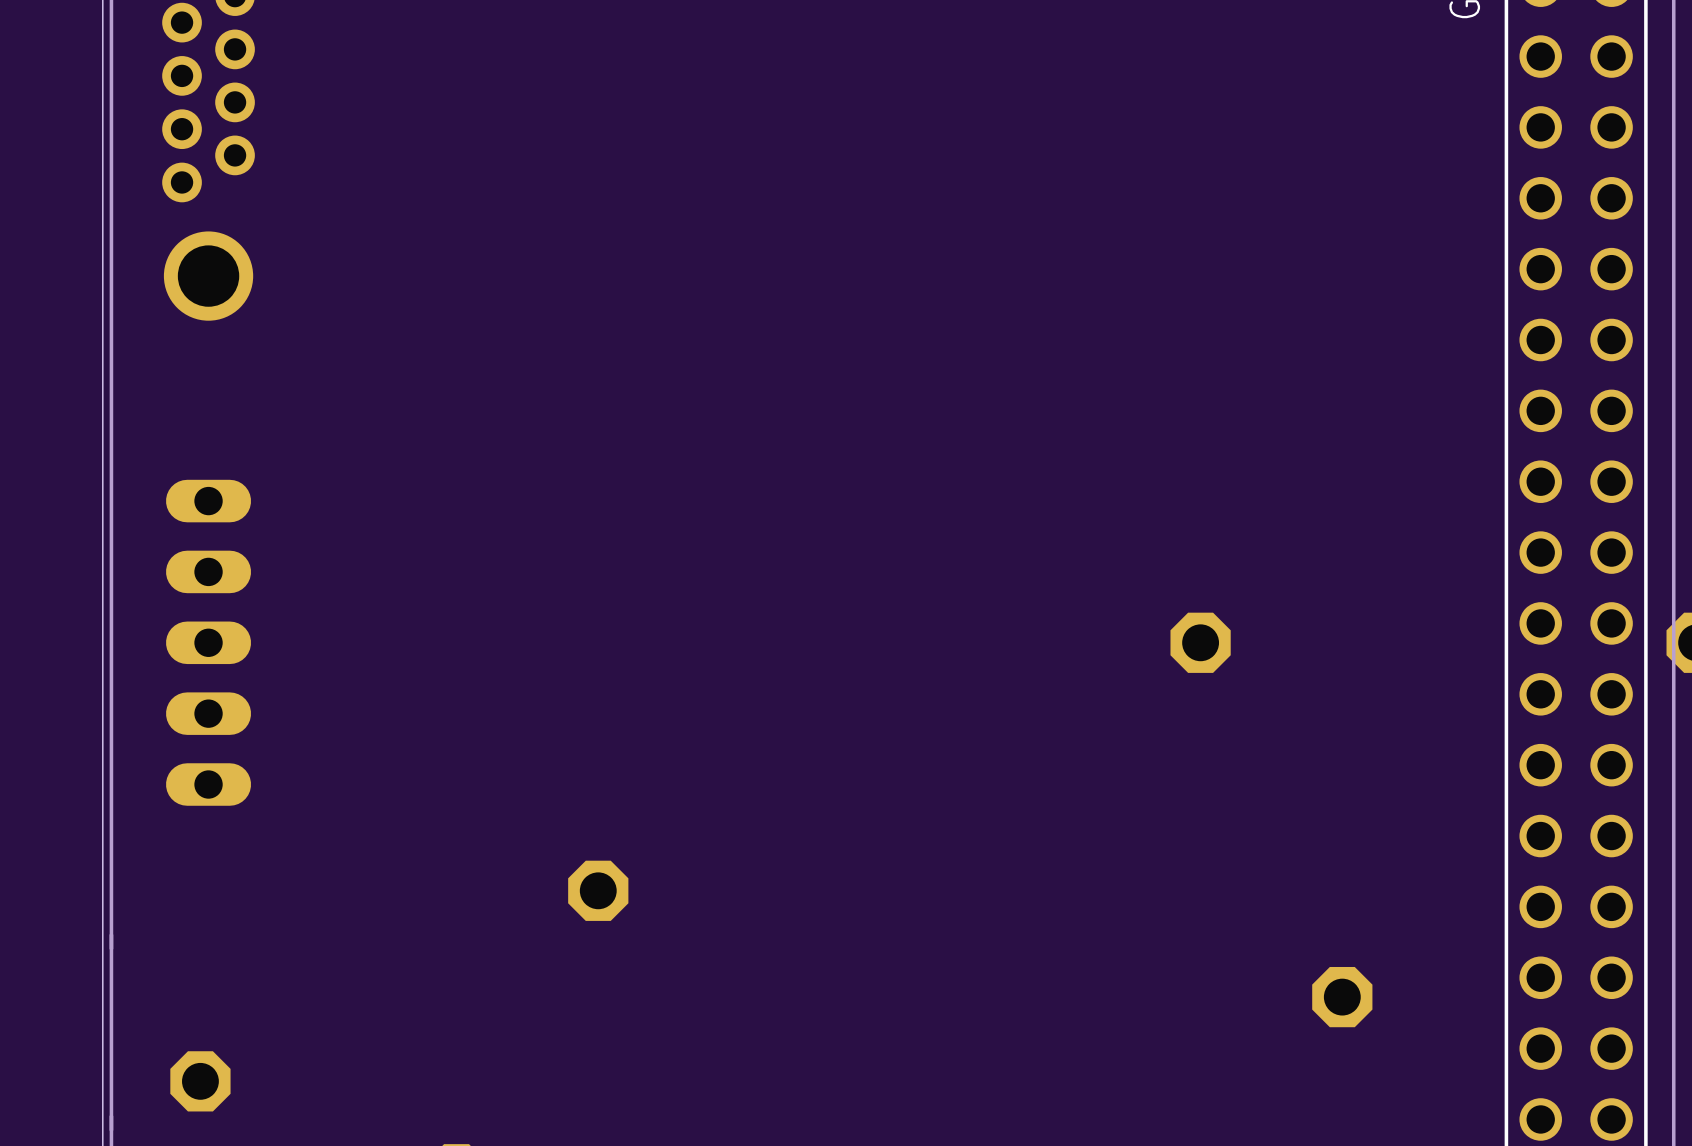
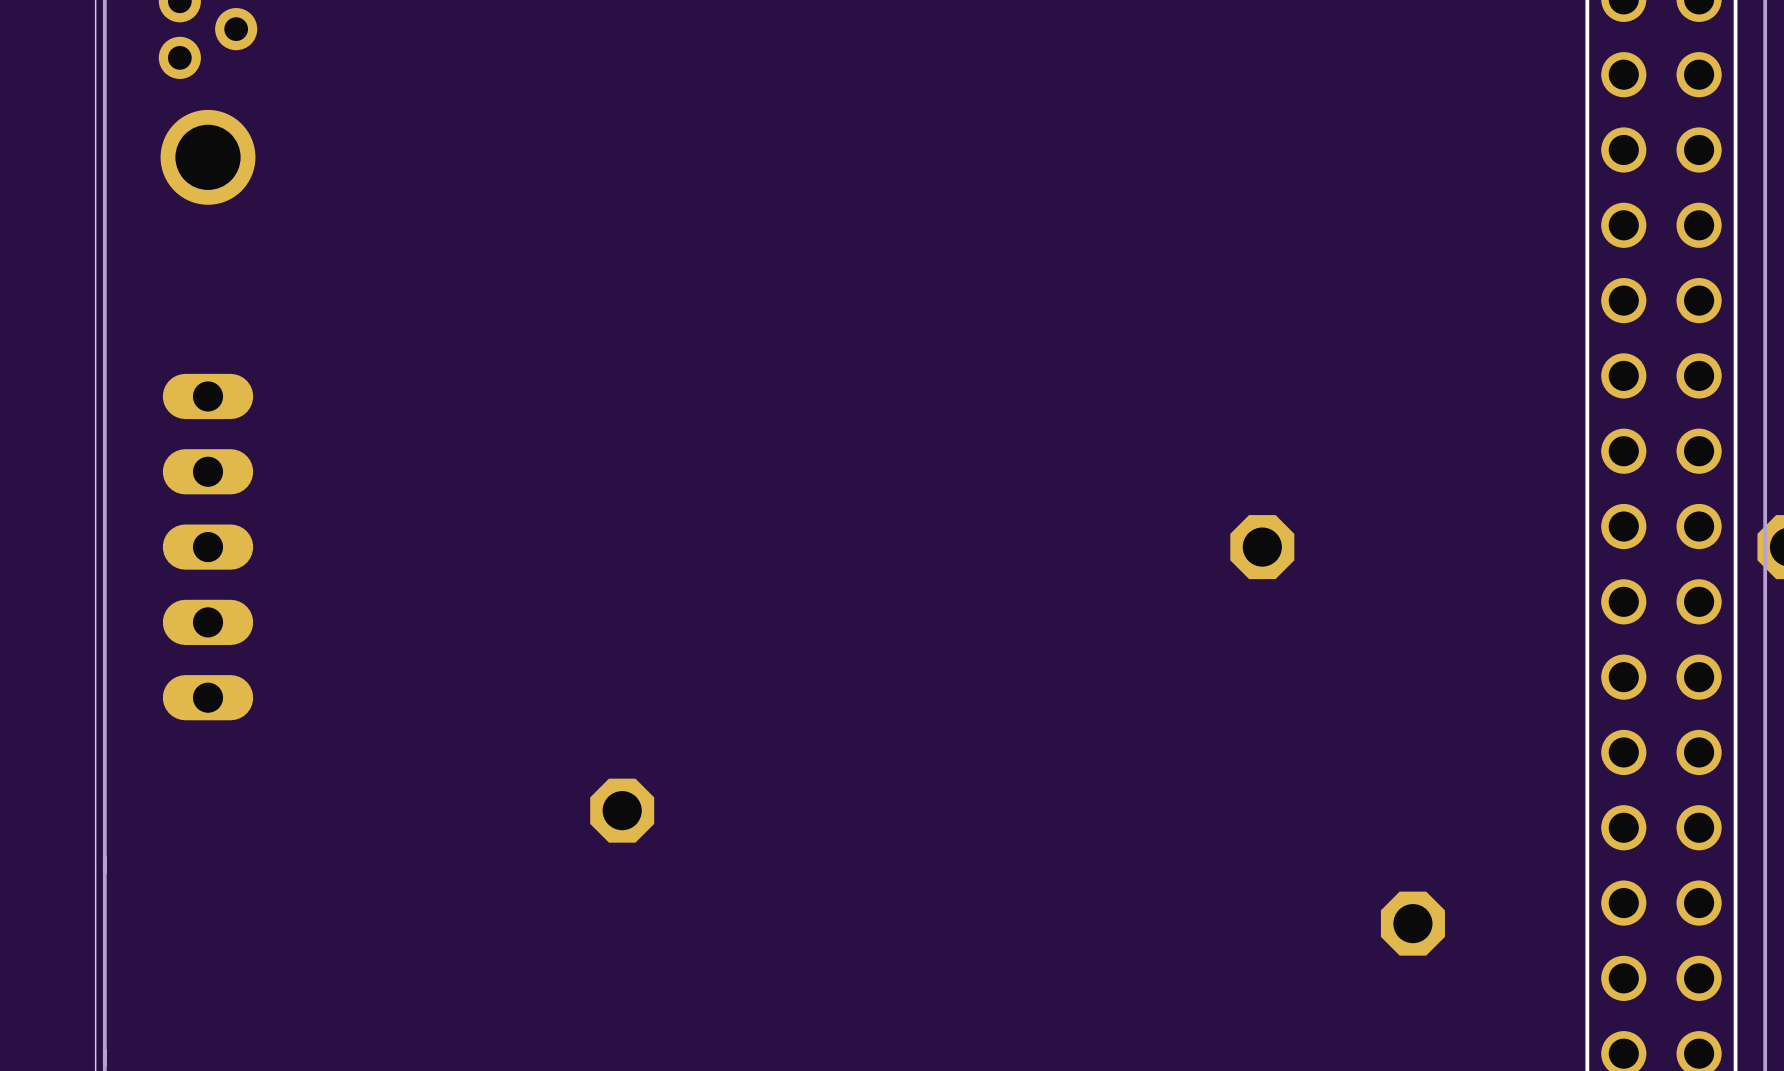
part: (200, 1081) -> none

